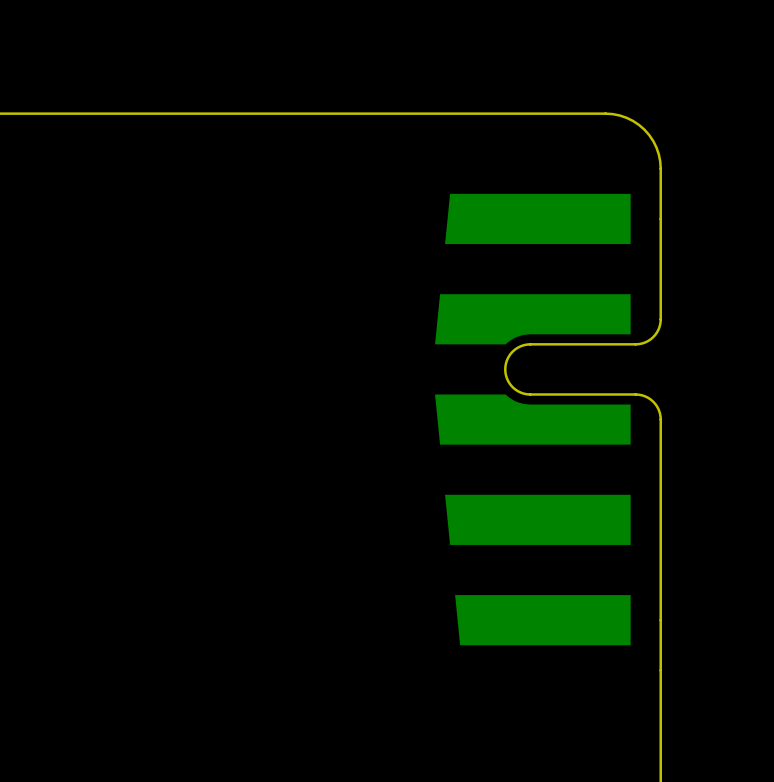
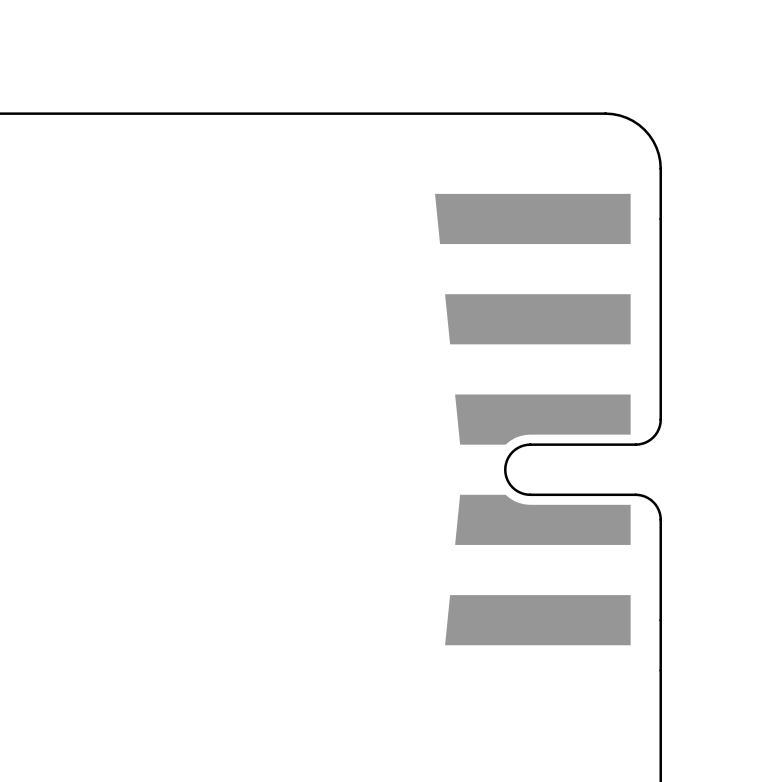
part footprint: [435, 193, 662, 646] -> [435, 193, 662, 646]

